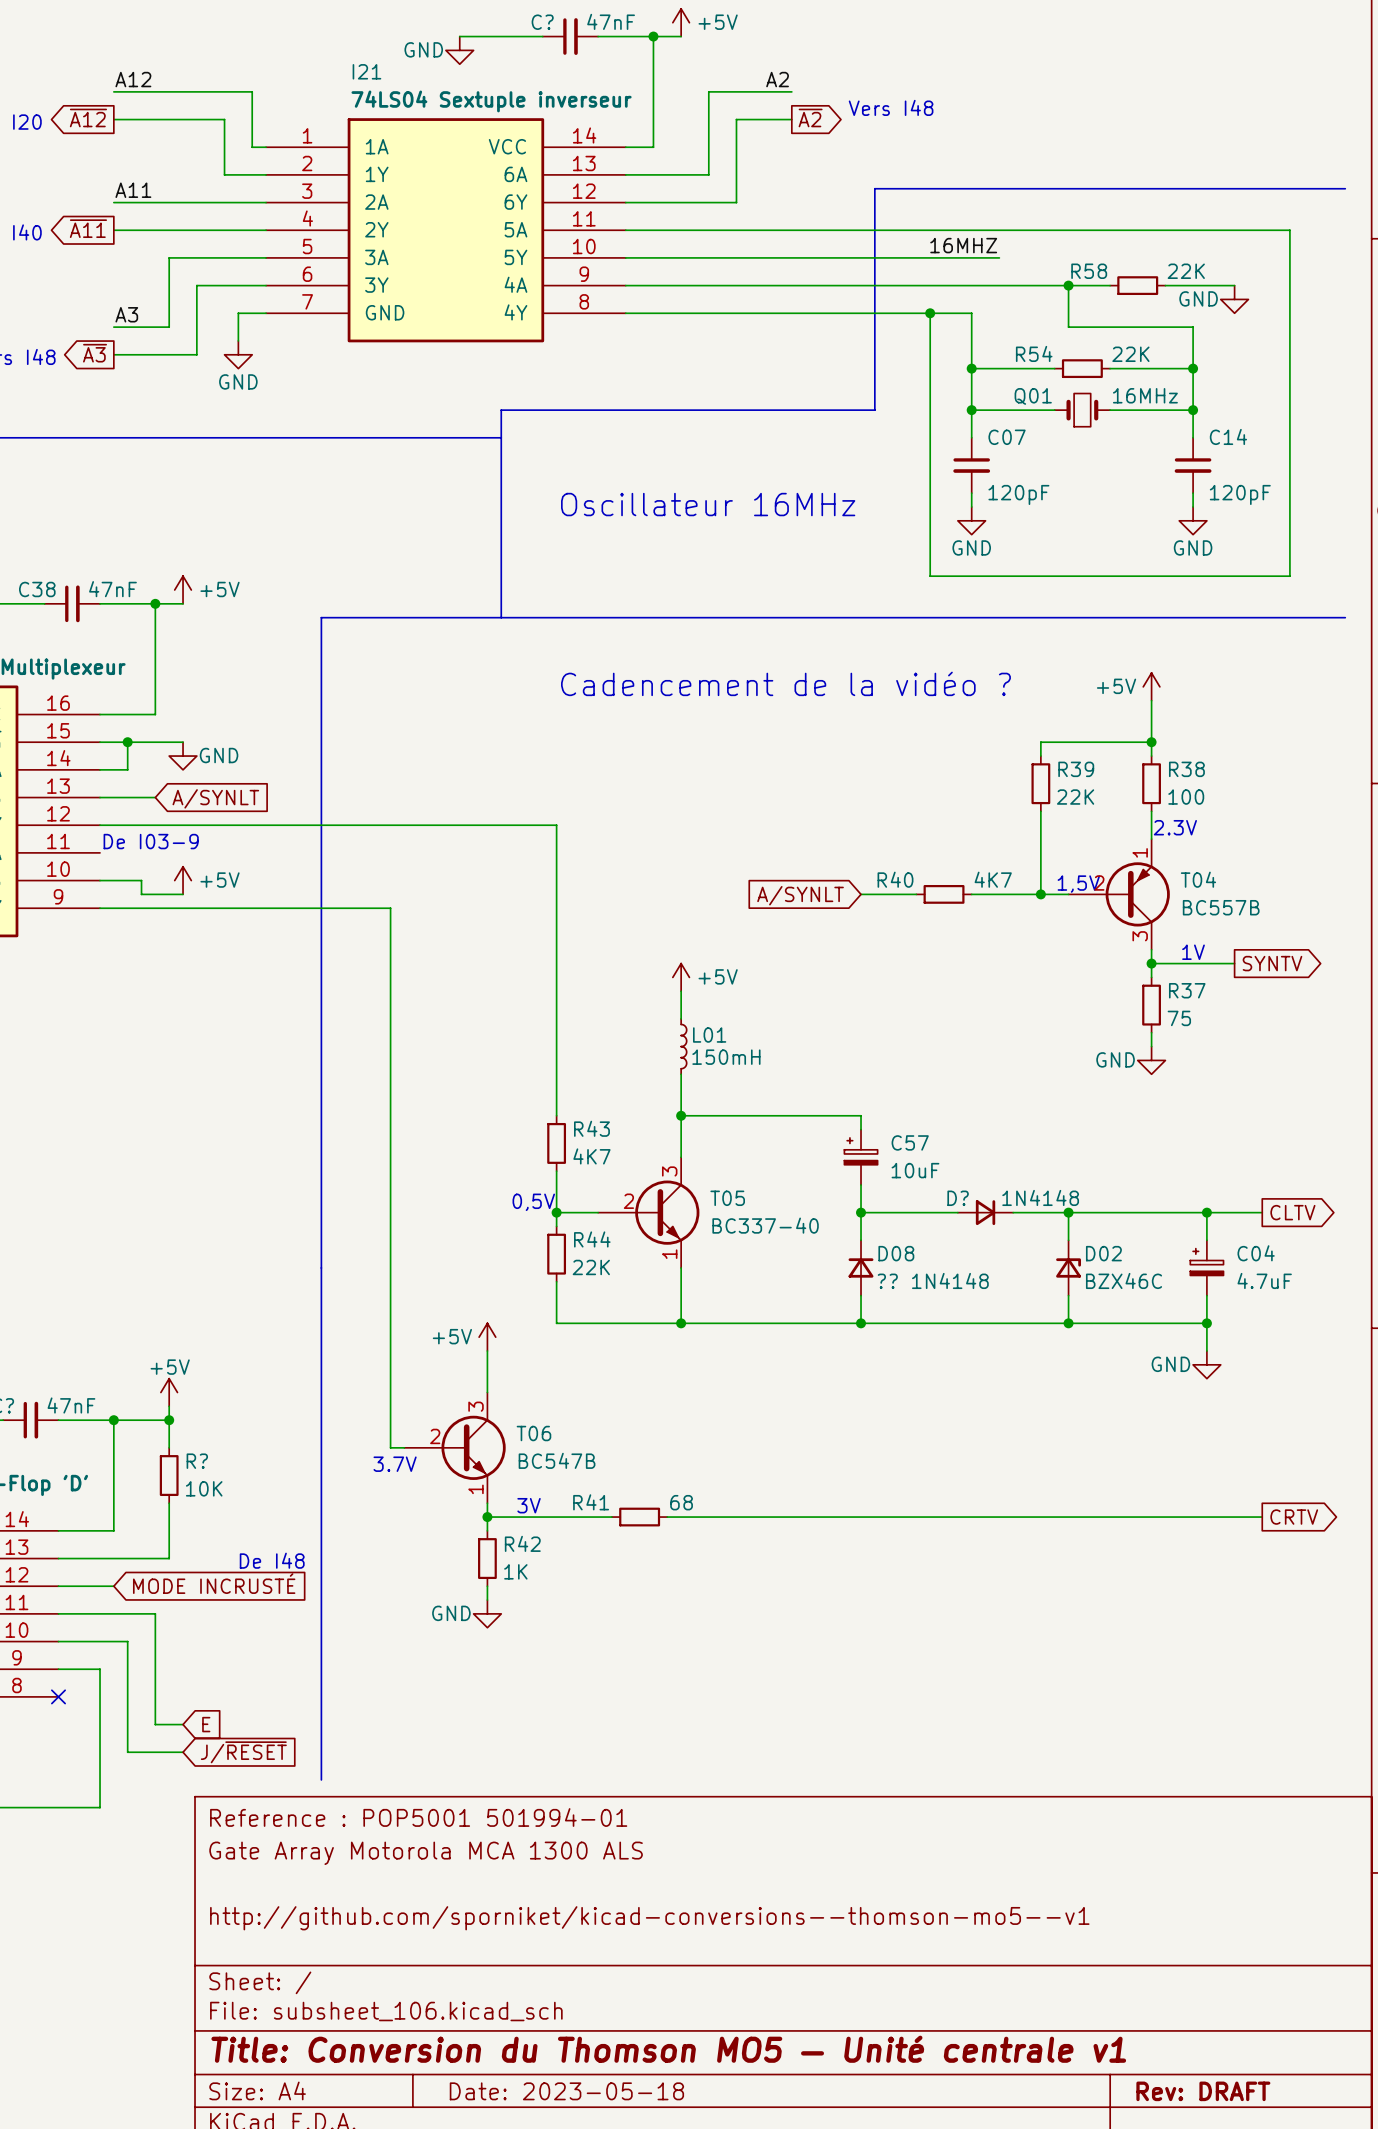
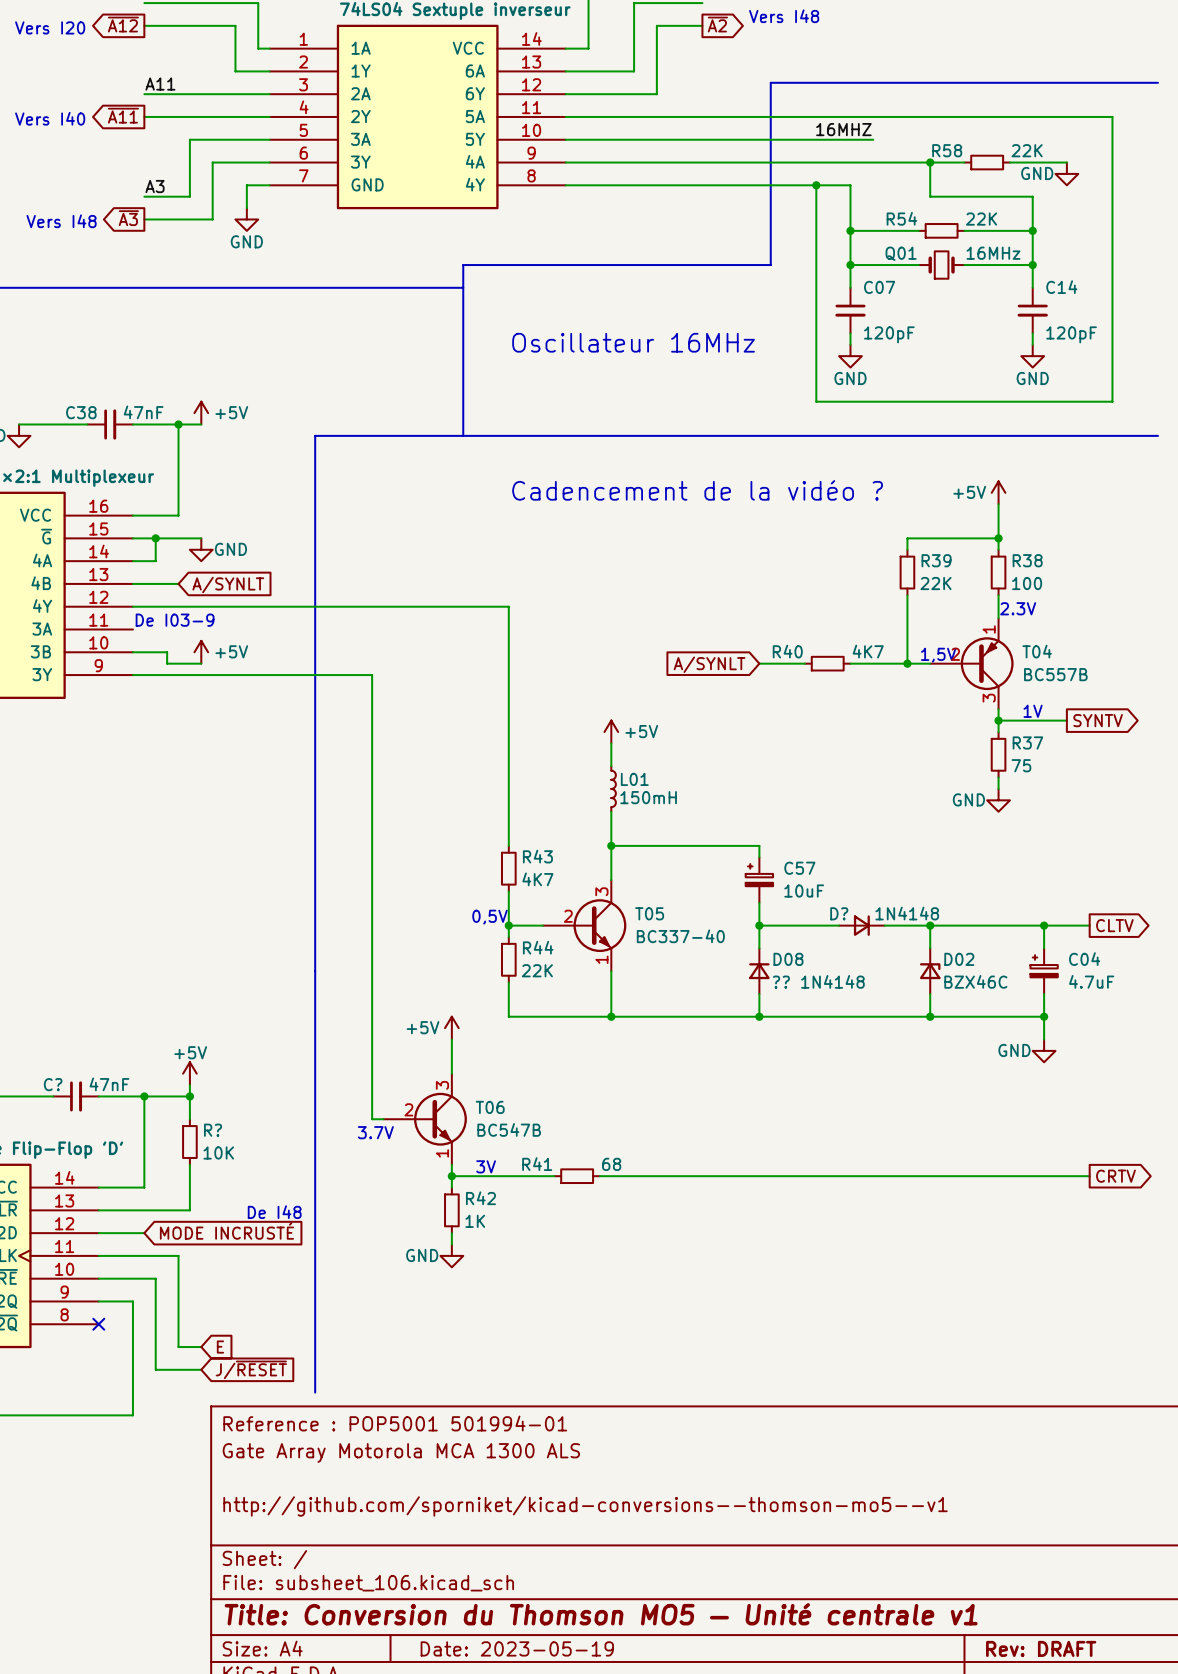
title block: Date: 2023-05-18 (566, 2091) -> Date: 2023-05-19 (517, 1648)

